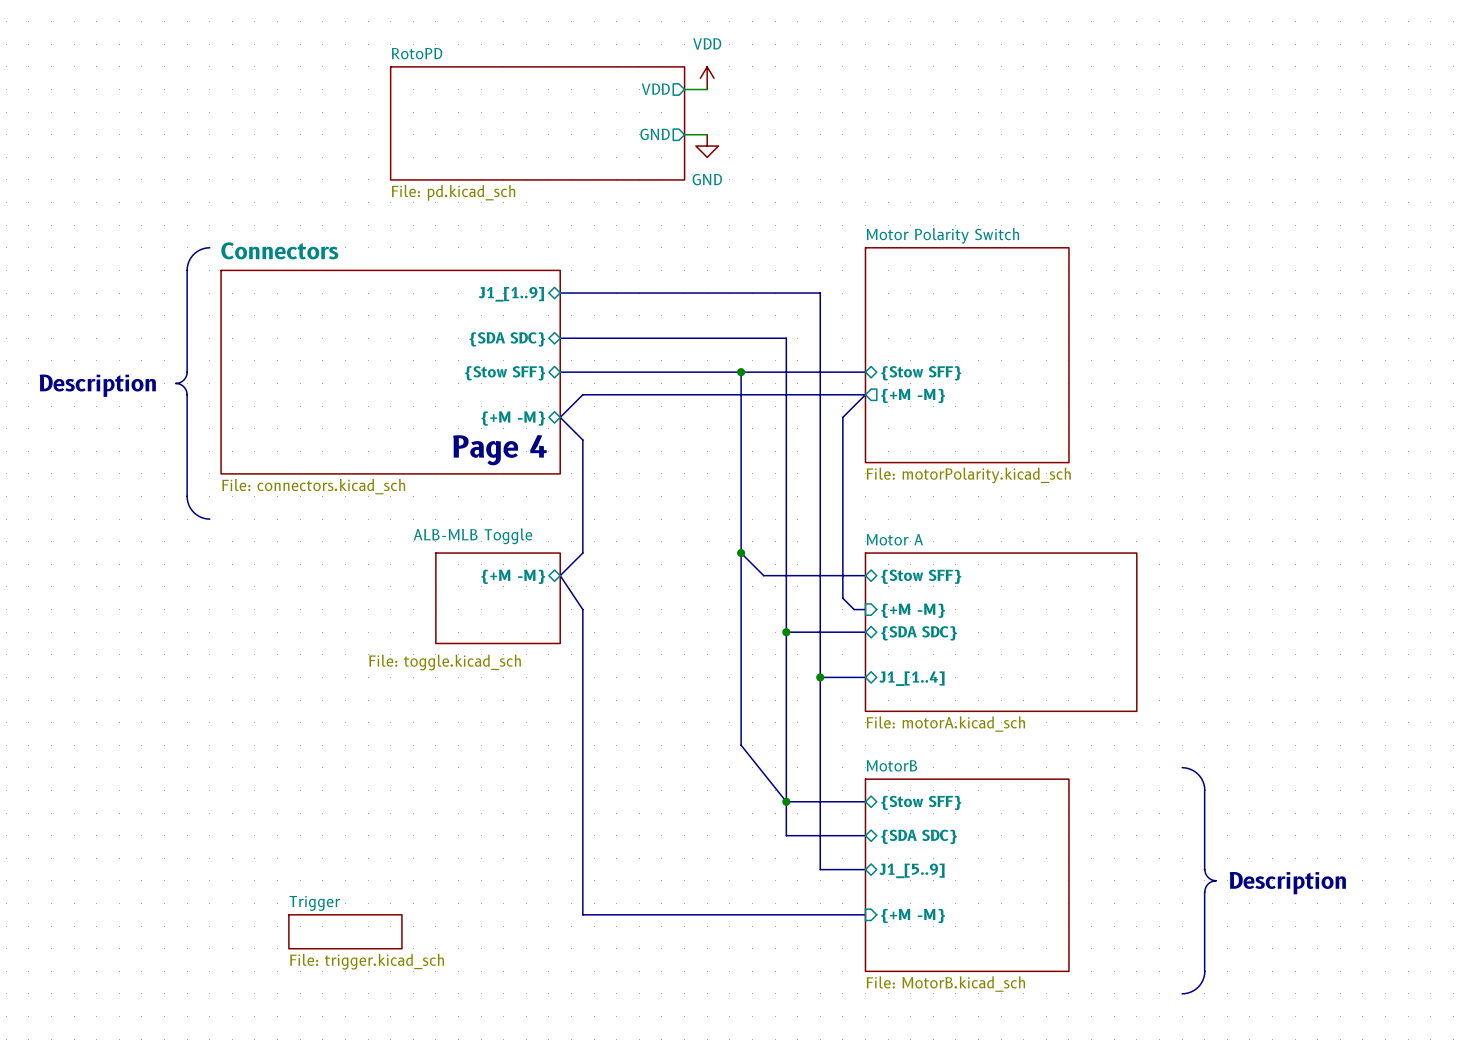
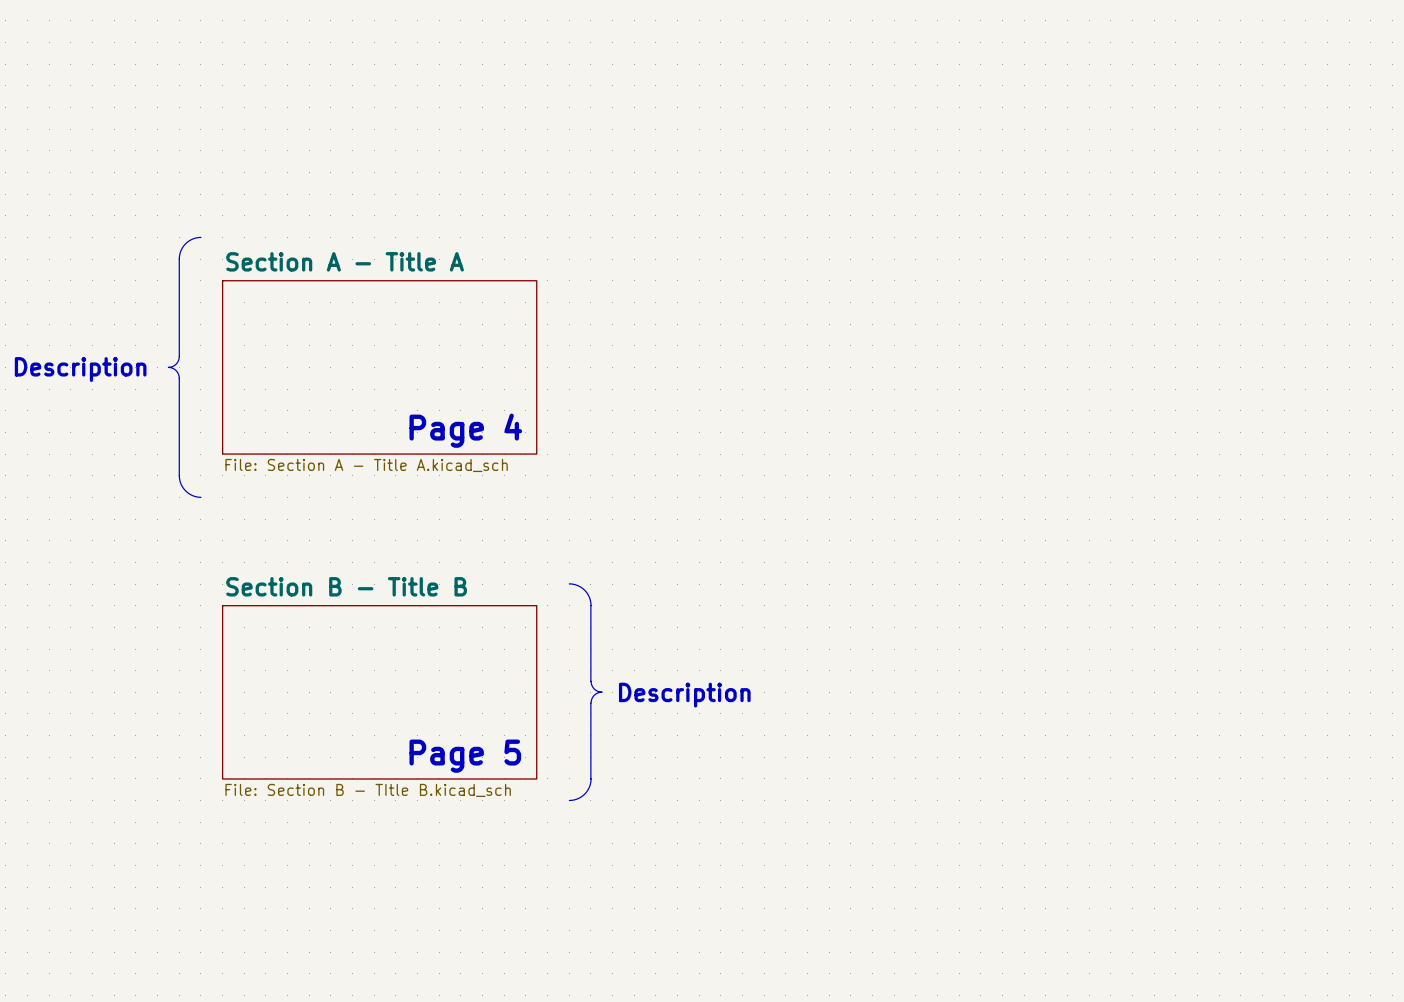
power symbol: VDD (707, 78) -> none
sheet pin: VDD (655, 89) -> none
wire: (684, 89) (707, 89) -> none
sheet RotoPD: File: pd.kicad_sch (537, 123) -> none
sheet pin: GND (655, 134) -> none
wire: (684, 134) (707, 134) -> none
power symbol: GND (707, 146) -> none
bus: (560, 293) (820, 293) (820, 869) (865, 869) -> none
sheet pin: J1_[1..9] (511, 294) -> none
bus: (560, 338) (786, 338) (786, 835) (865, 835) -> none
sheet pin: {SDA SDC} (507, 339) -> none
sheet Motor Polarity Switch: File: motorPolarity.kicad_sch (967, 355) -> none
sheet Connectors: File: connectors.kicad_sch (390, 372) -> none
bus: (560, 372) (865, 372) -> none
bus: (741, 372) (741, 745) (786, 801) (865, 801) -> none
junction: (741, 372) -> none
sheet pin: {Stow SFF} (505, 373) -> none
sheet pin: {Stow SFF} (921, 373) -> none
sheet Section A - Title A: none -> File: Section A - Title A.kicad_sch (379, 367)
sheet pin: {+M -M} (913, 395) -> none
sheet pin: {+M -M} (513, 418) -> none
bus: (741, 553) (763, 575) (865, 575) -> none
junction: (741, 553) -> none
sheet pin: {+M -M} (513, 576) -> none
sheet pin: {Stow SFF} (921, 576) -> none
sheet ALB-MLB Toggle: File: toggle.kicad_sch (498, 598) -> none
line: none -> (569, 583) (577, 585) (584, 590) (589, 597) (591, 605)
bus: (865, 609) (854, 609) (842, 598) (842, 417) (865, 394) (582, 394) (560, 417) (582, 439) (582, 553) (560, 575) (582, 609) (582, 914) (865, 914) -> none
sheet pin: {+M -M} (913, 610) -> none
line: none -> (590, 605) (590, 681)
bus: (786, 632) (865, 632) -> none
junction: (786, 632) -> none
sheet Motor A: File: motorA.kicad_sch (1001, 632) -> none
sheet pin: {SDA SDC} (919, 633) -> none
bus: (820, 677) (865, 677) -> none
junction: (820, 677) -> none
sheet pin: J1_[1..4] (912, 678) -> none
line: none -> (591, 681) (594, 688) (601, 692) (594, 695) (591, 702)
sheet Section B - Title B: none -> File: Section B - TItle B.kicad_sch (379, 692)
text: none -> Description (684, 695)
line: none -> (590, 703) (590, 778)
line: (1182, 767) (1190, 769) (1198, 774) (1203, 781) (1204, 790) -> none
text: none -> Page 5 (465, 756)
line: (1204, 790) (1204, 869) -> none
junction: (786, 801) -> none
sheet pin: {Stow SFF} (921, 802) -> none
line: none -> (591, 778) (589, 785) (584, 794) (576, 799) (569, 800)
sheet pin: {SDA SDC} (919, 836) -> none
line: (1204, 869) (1208, 877) (1216, 880) (1208, 884) (1204, 892) -> none
sheet pin: J1_[5..9] (912, 870) -> none
sheet MotorB: File: MotorB.kicad_sch (967, 875) -> none
text: Description (1287, 883) -> none
line: (1204, 892) (1204, 971) -> none
sheet pin: {+M -M} (913, 915) -> none
sheet Trigger: File: trigger.kicad_sch (345, 931) -> none
line: (1204, 971) (1203, 978) (1198, 987) (1192, 991) (1182, 993) -> none

